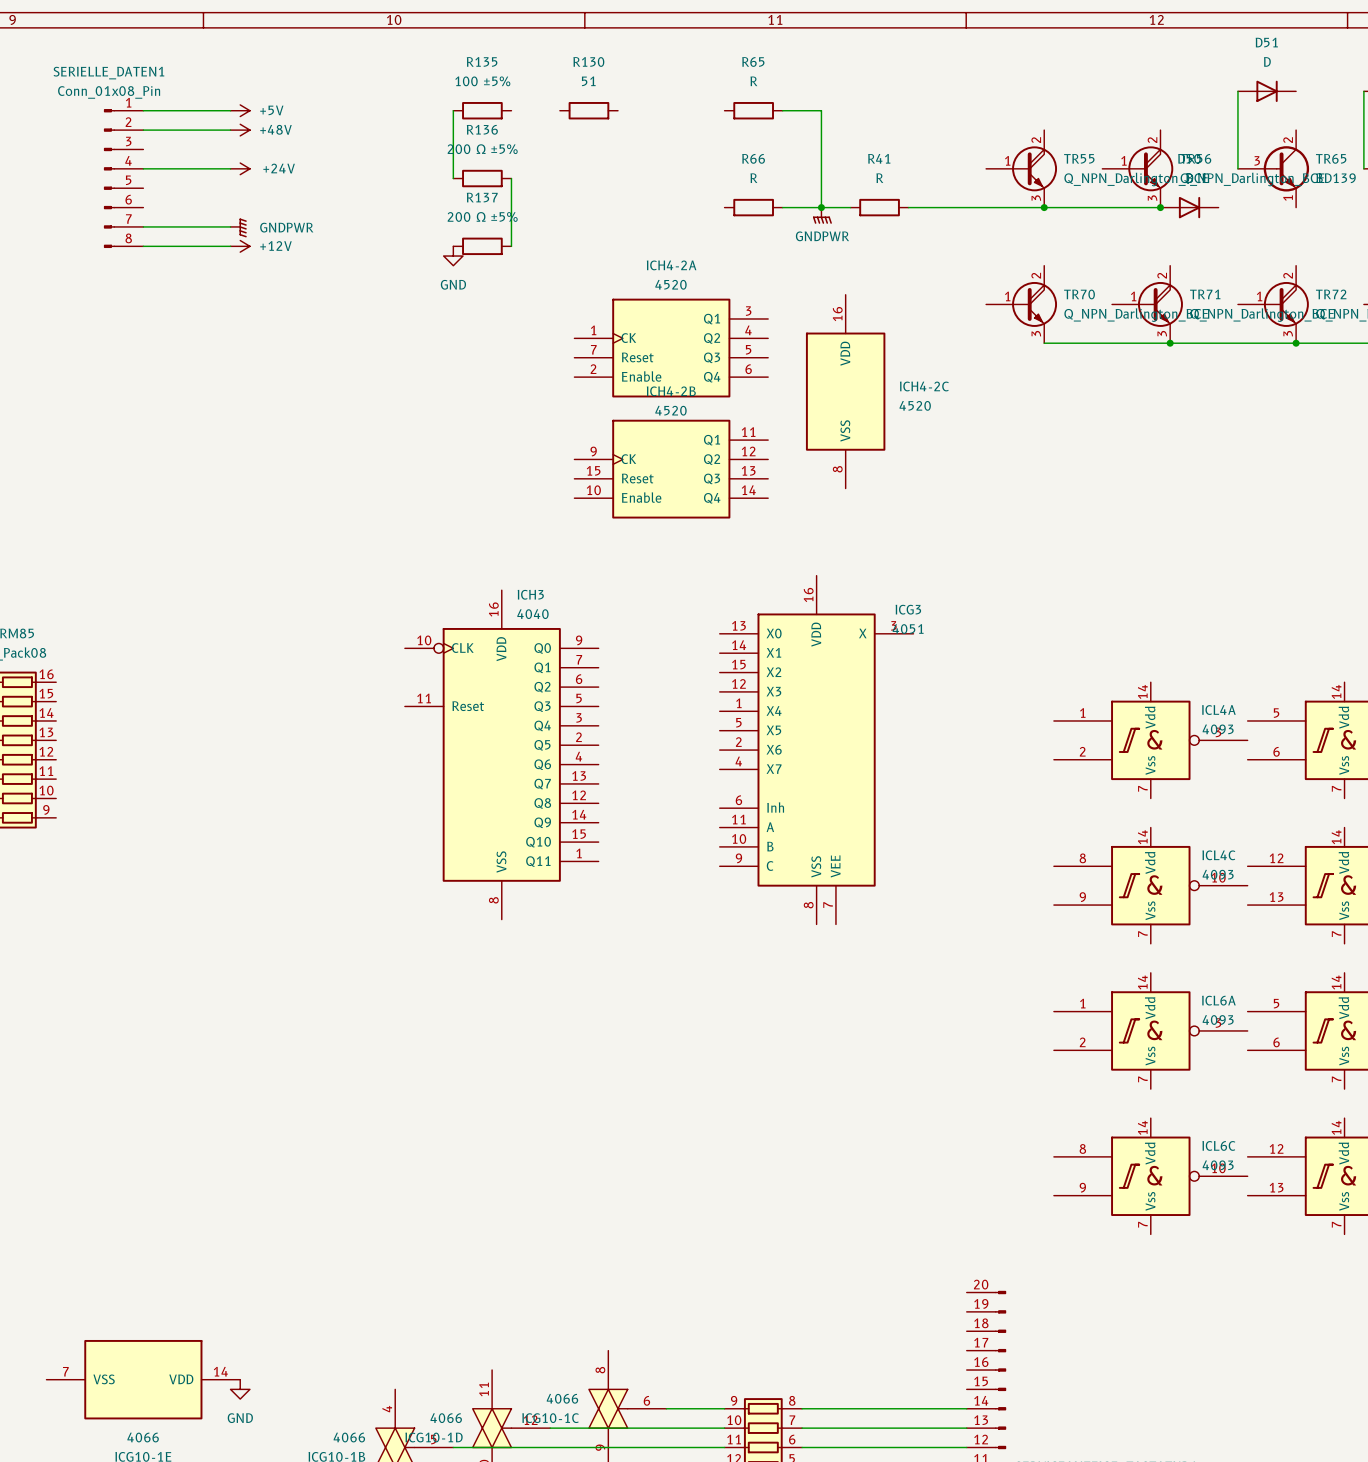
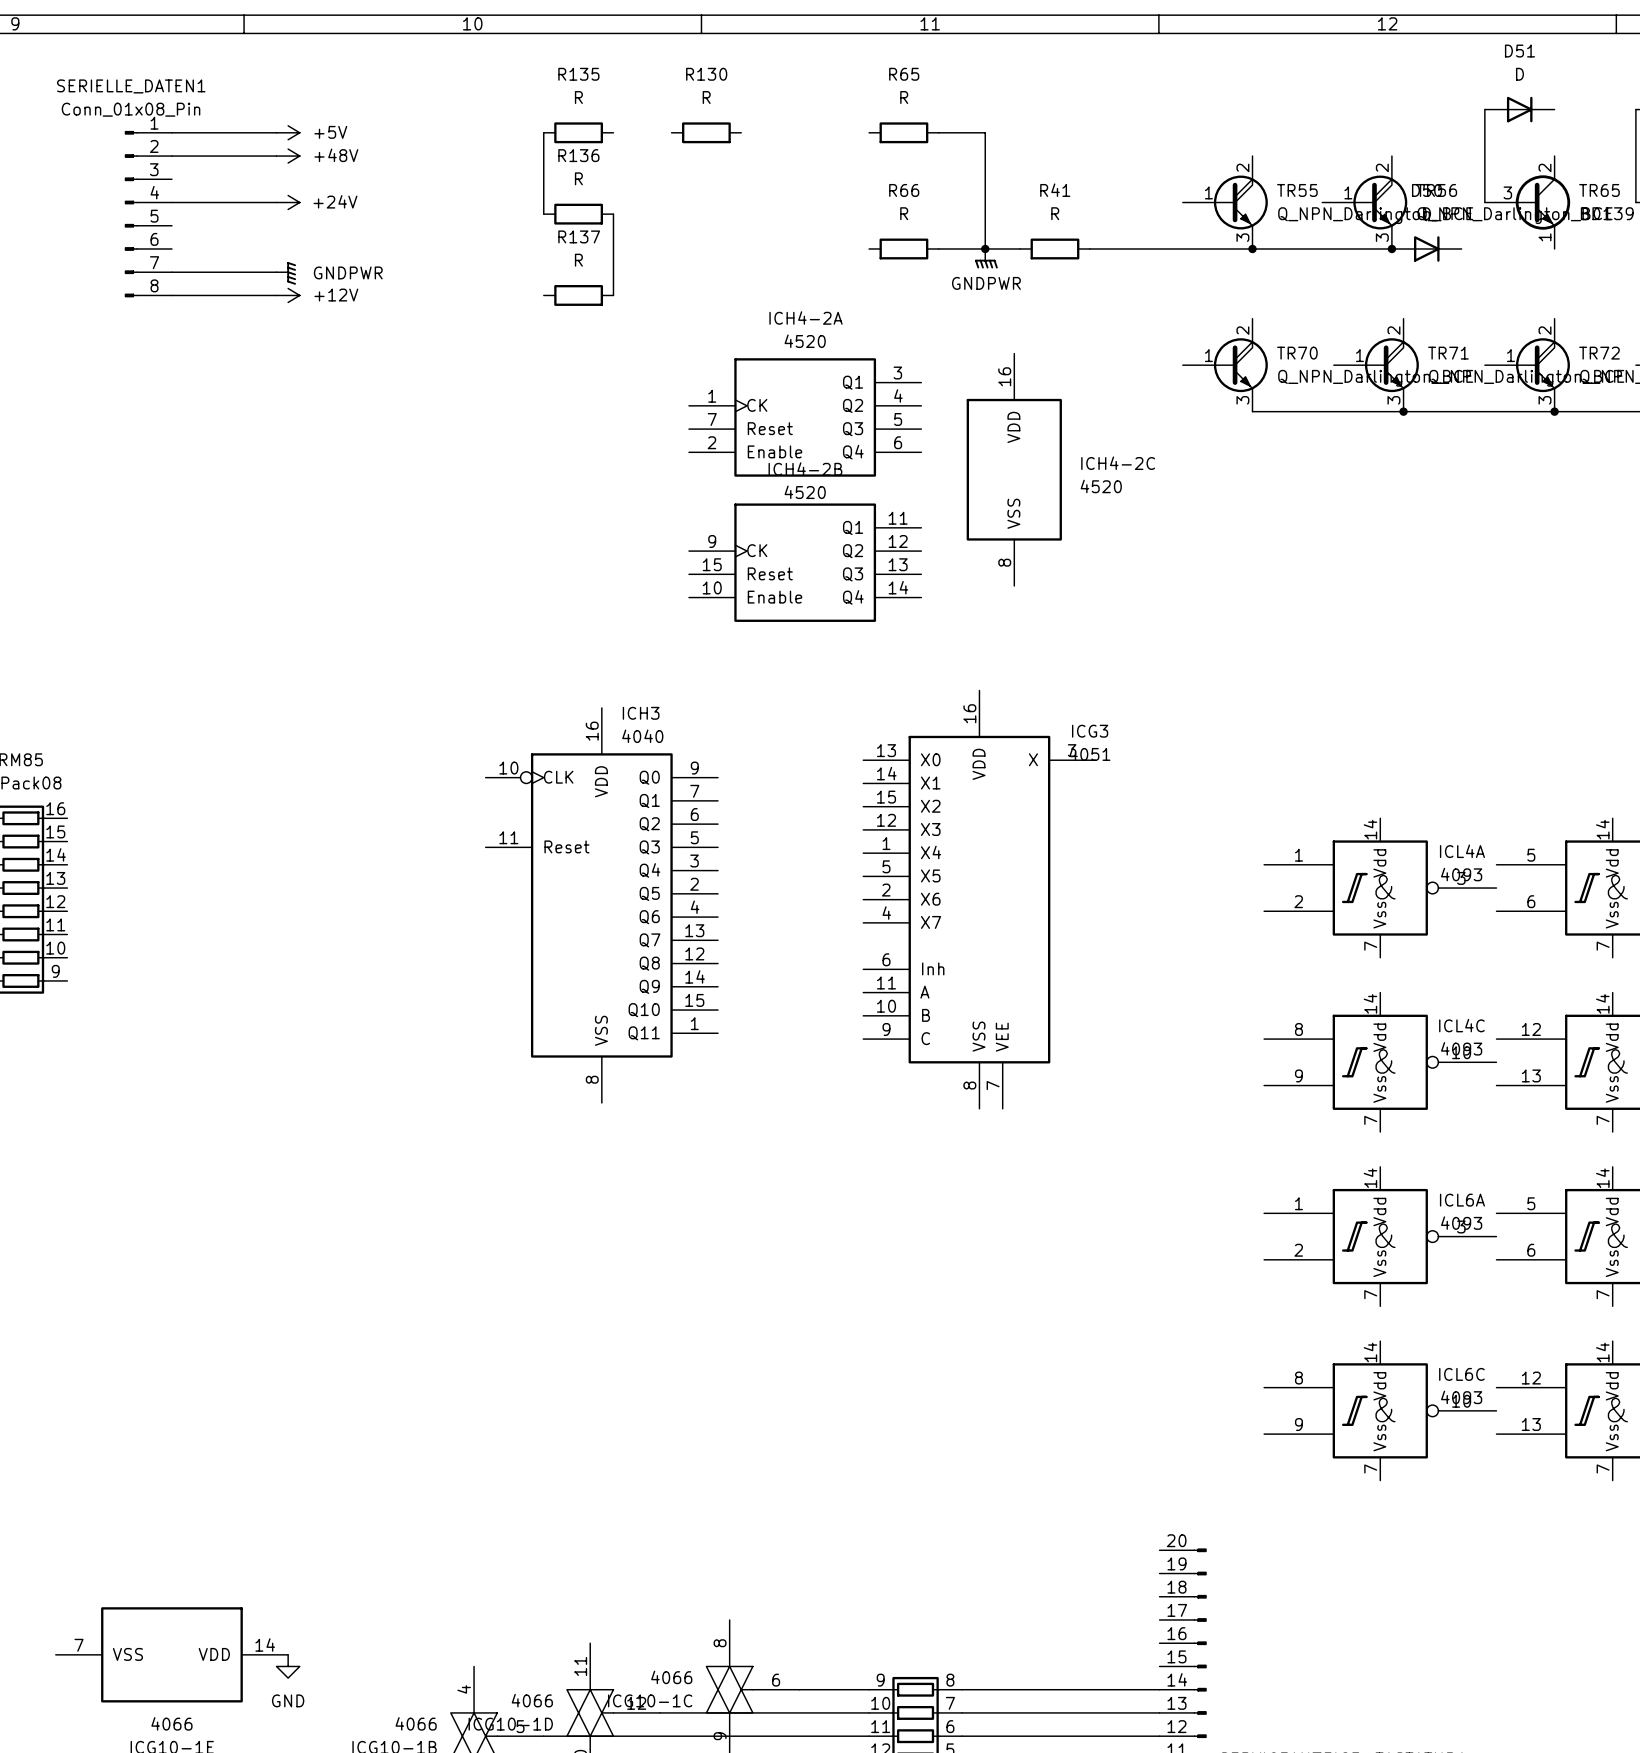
R135 value: 100 ±5% (482, 81) -> R (578, 97)
R130 value: 51 (588, 81) -> R (706, 97)
R136 value: 200 Ω ±5% (482, 149) -> R (578, 178)
R137 value: 200 Ω ±5% (482, 216) -> R (578, 260)
power symbol: GND (453, 256) -> none

